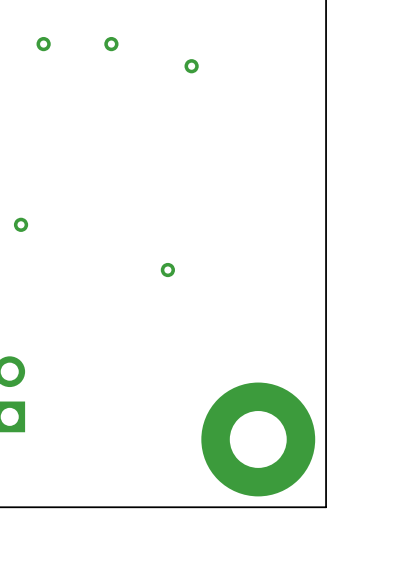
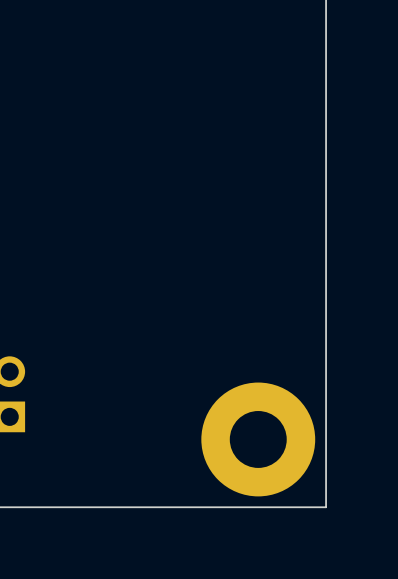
via: (43, 44) -> none
via: (111, 44) -> none
via: (191, 66) -> none
via: (21, 224) -> none
via: (167, 270) -> none

